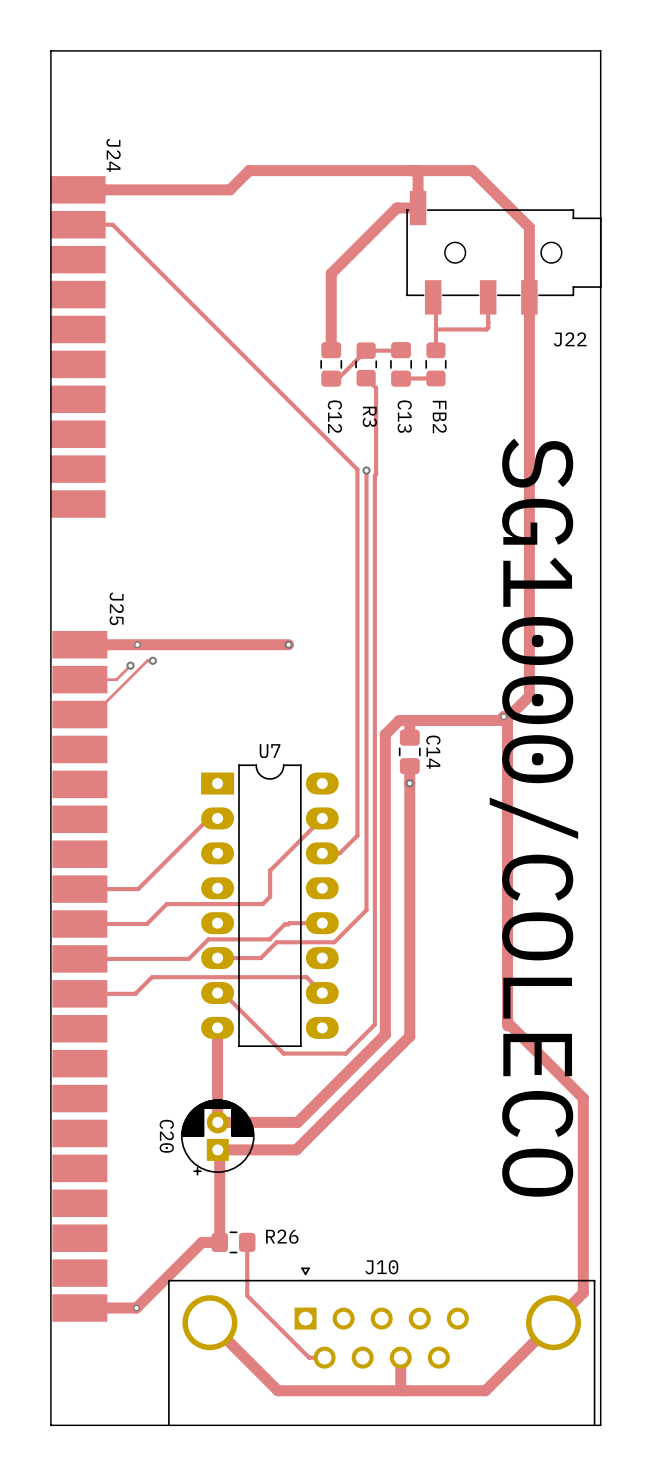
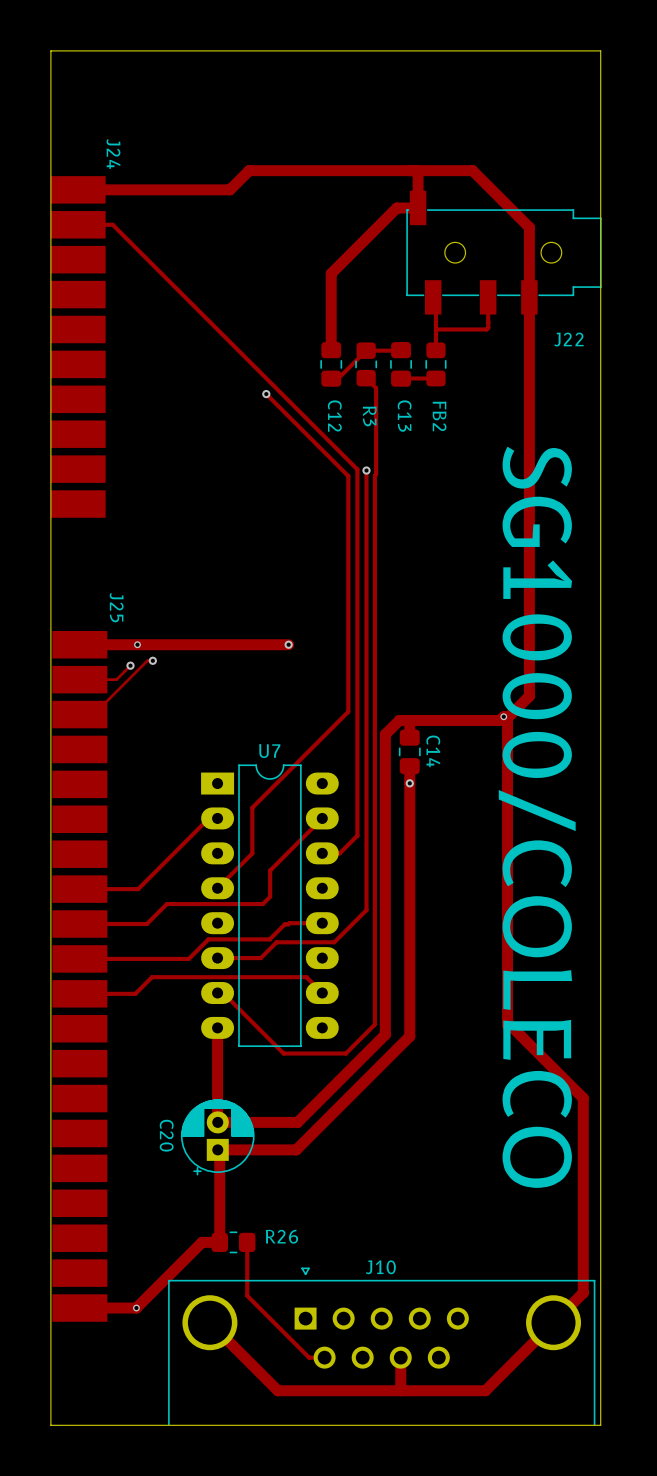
track: none -> (266, 394) (348, 476) (348, 711) (252, 807) (252, 853) (217, 888)
via: none -> (266, 394)

